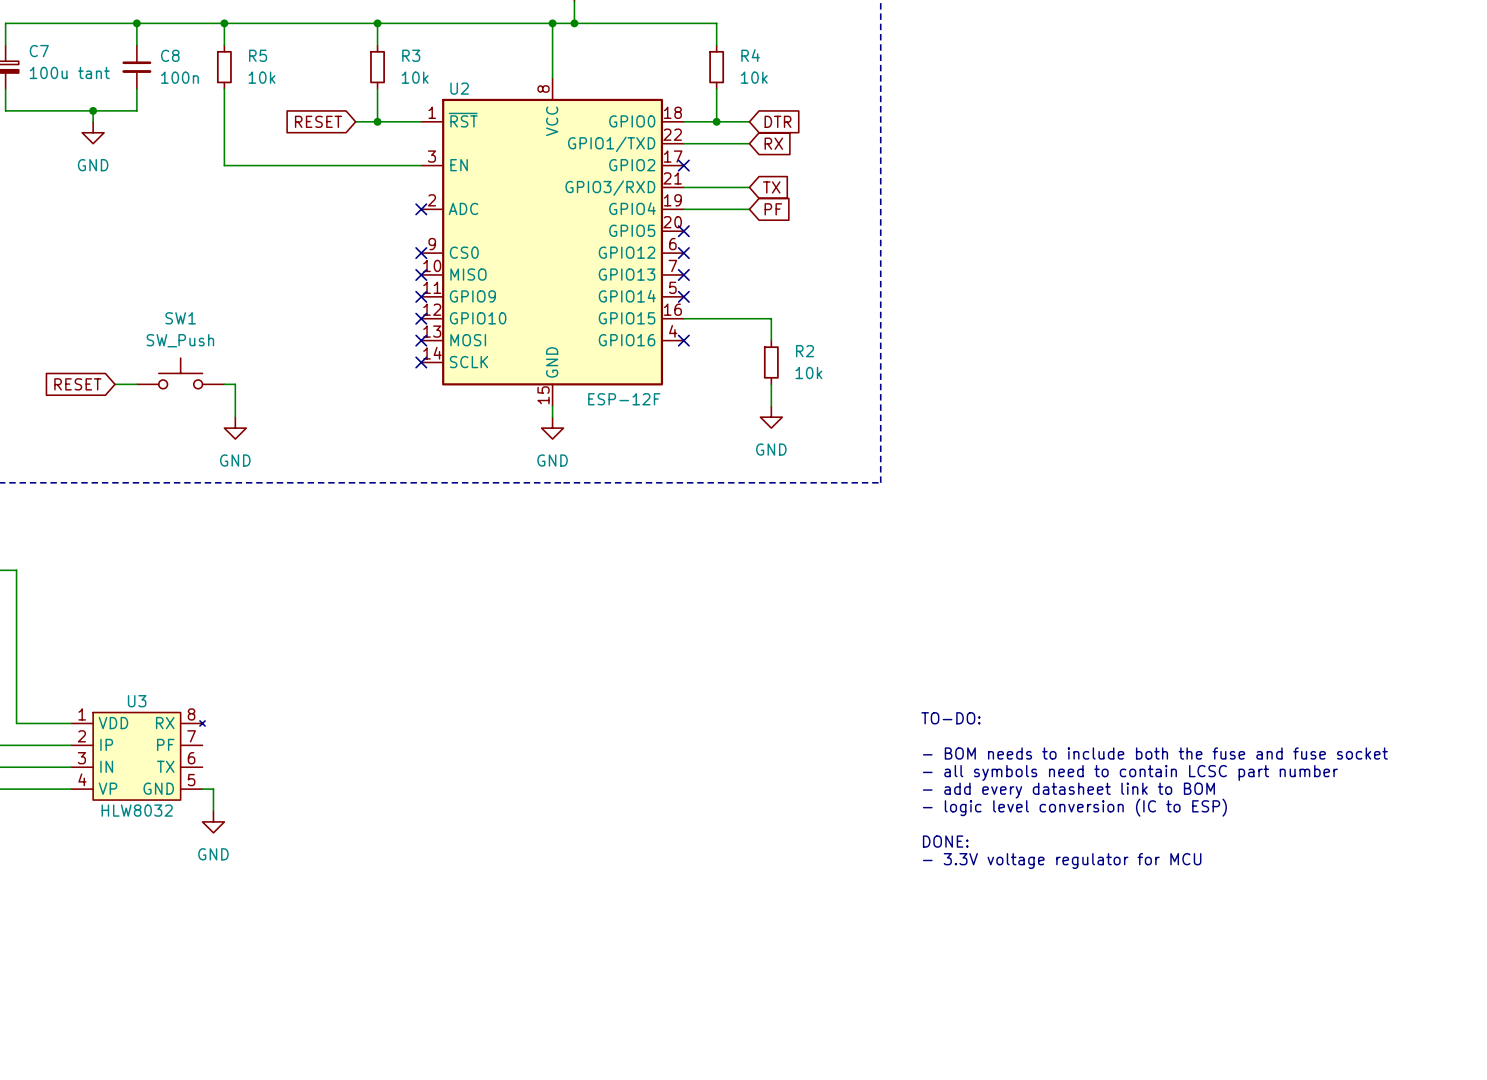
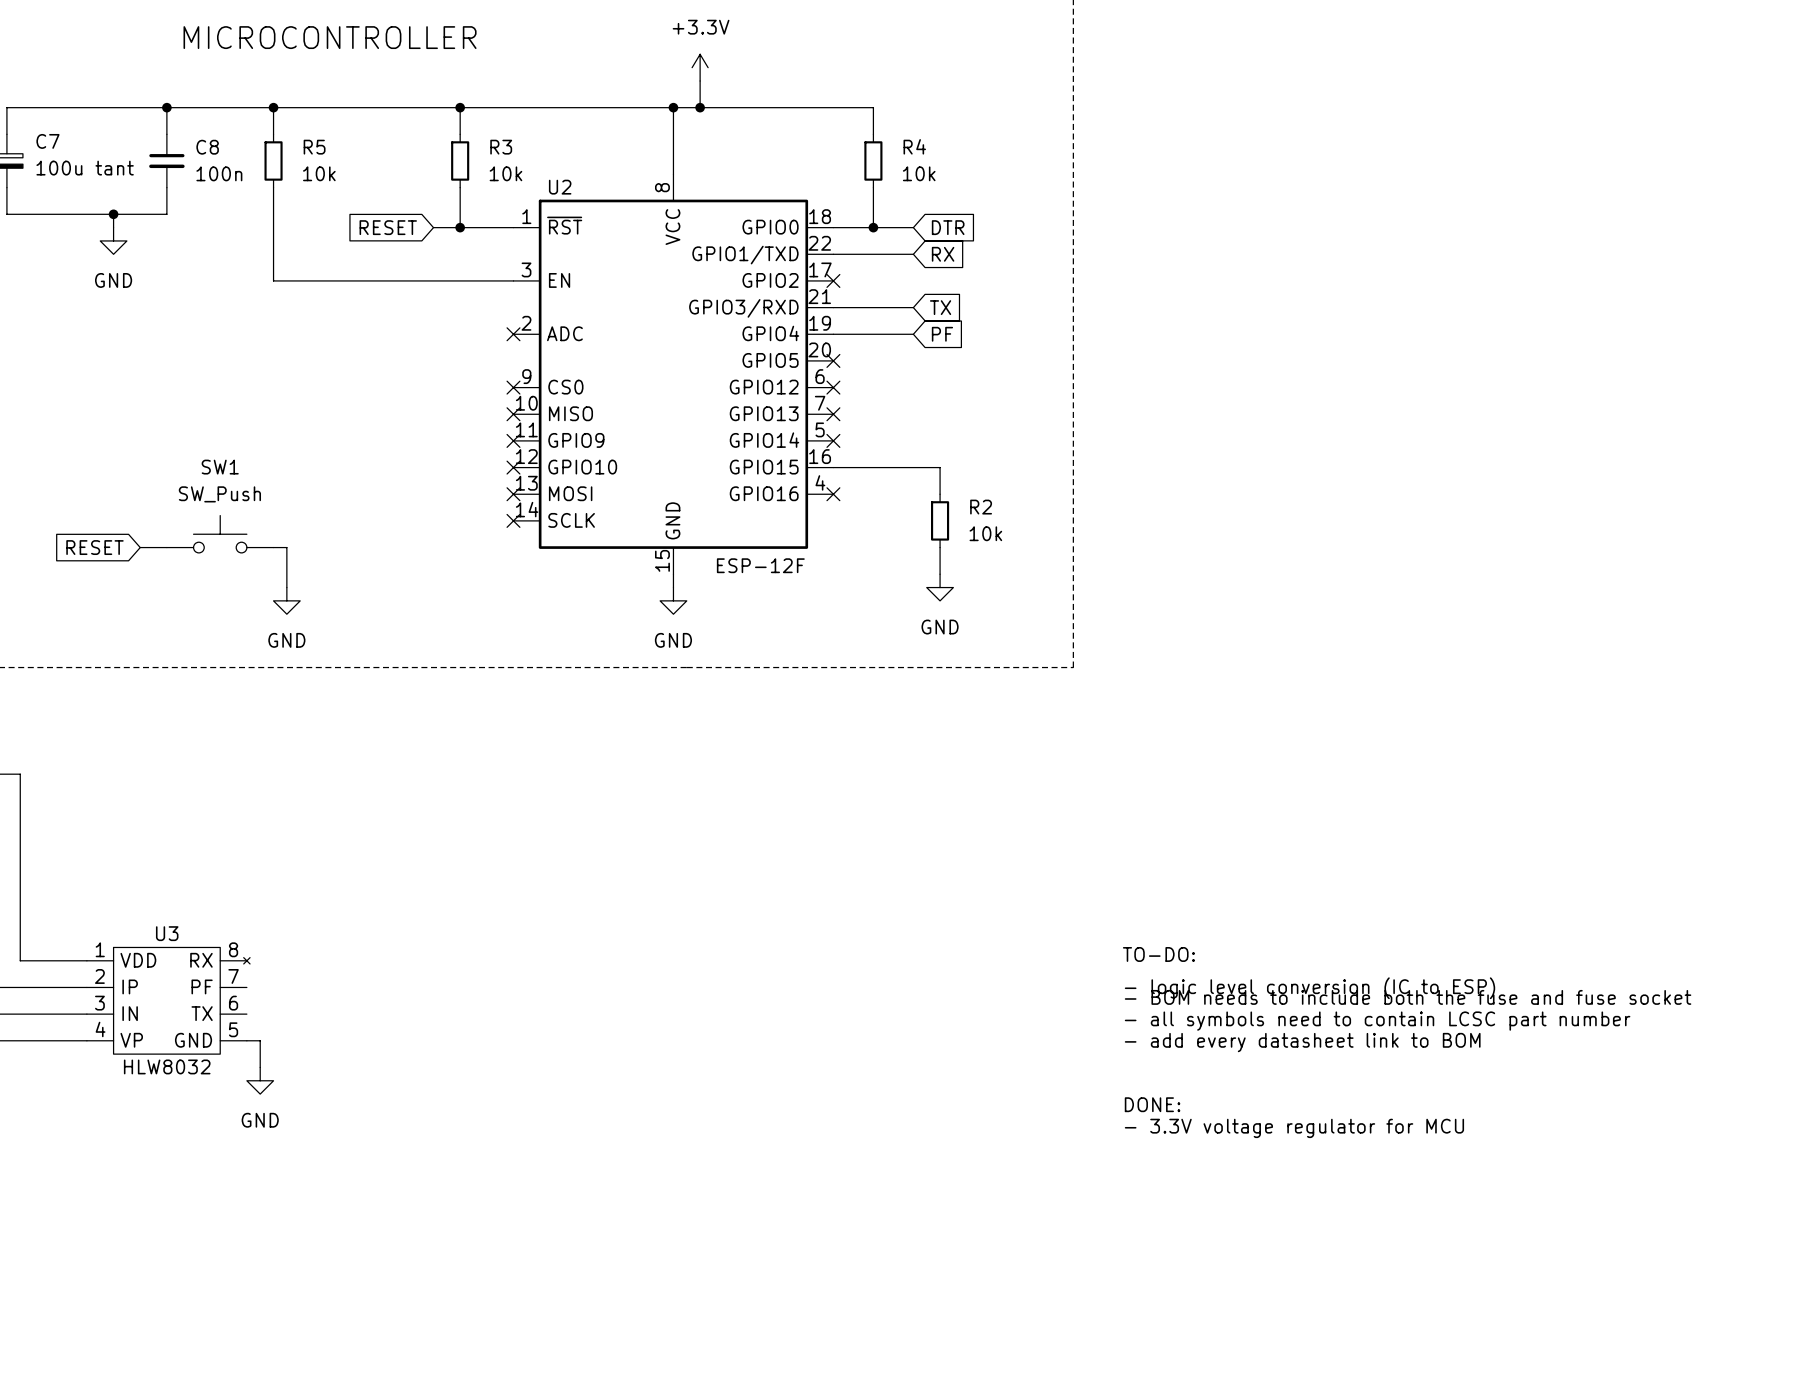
text position: - logic level conversion (IC to ESP) (1074, 807) -> - logic level conversion (IC to ESP) (1309, 988)

